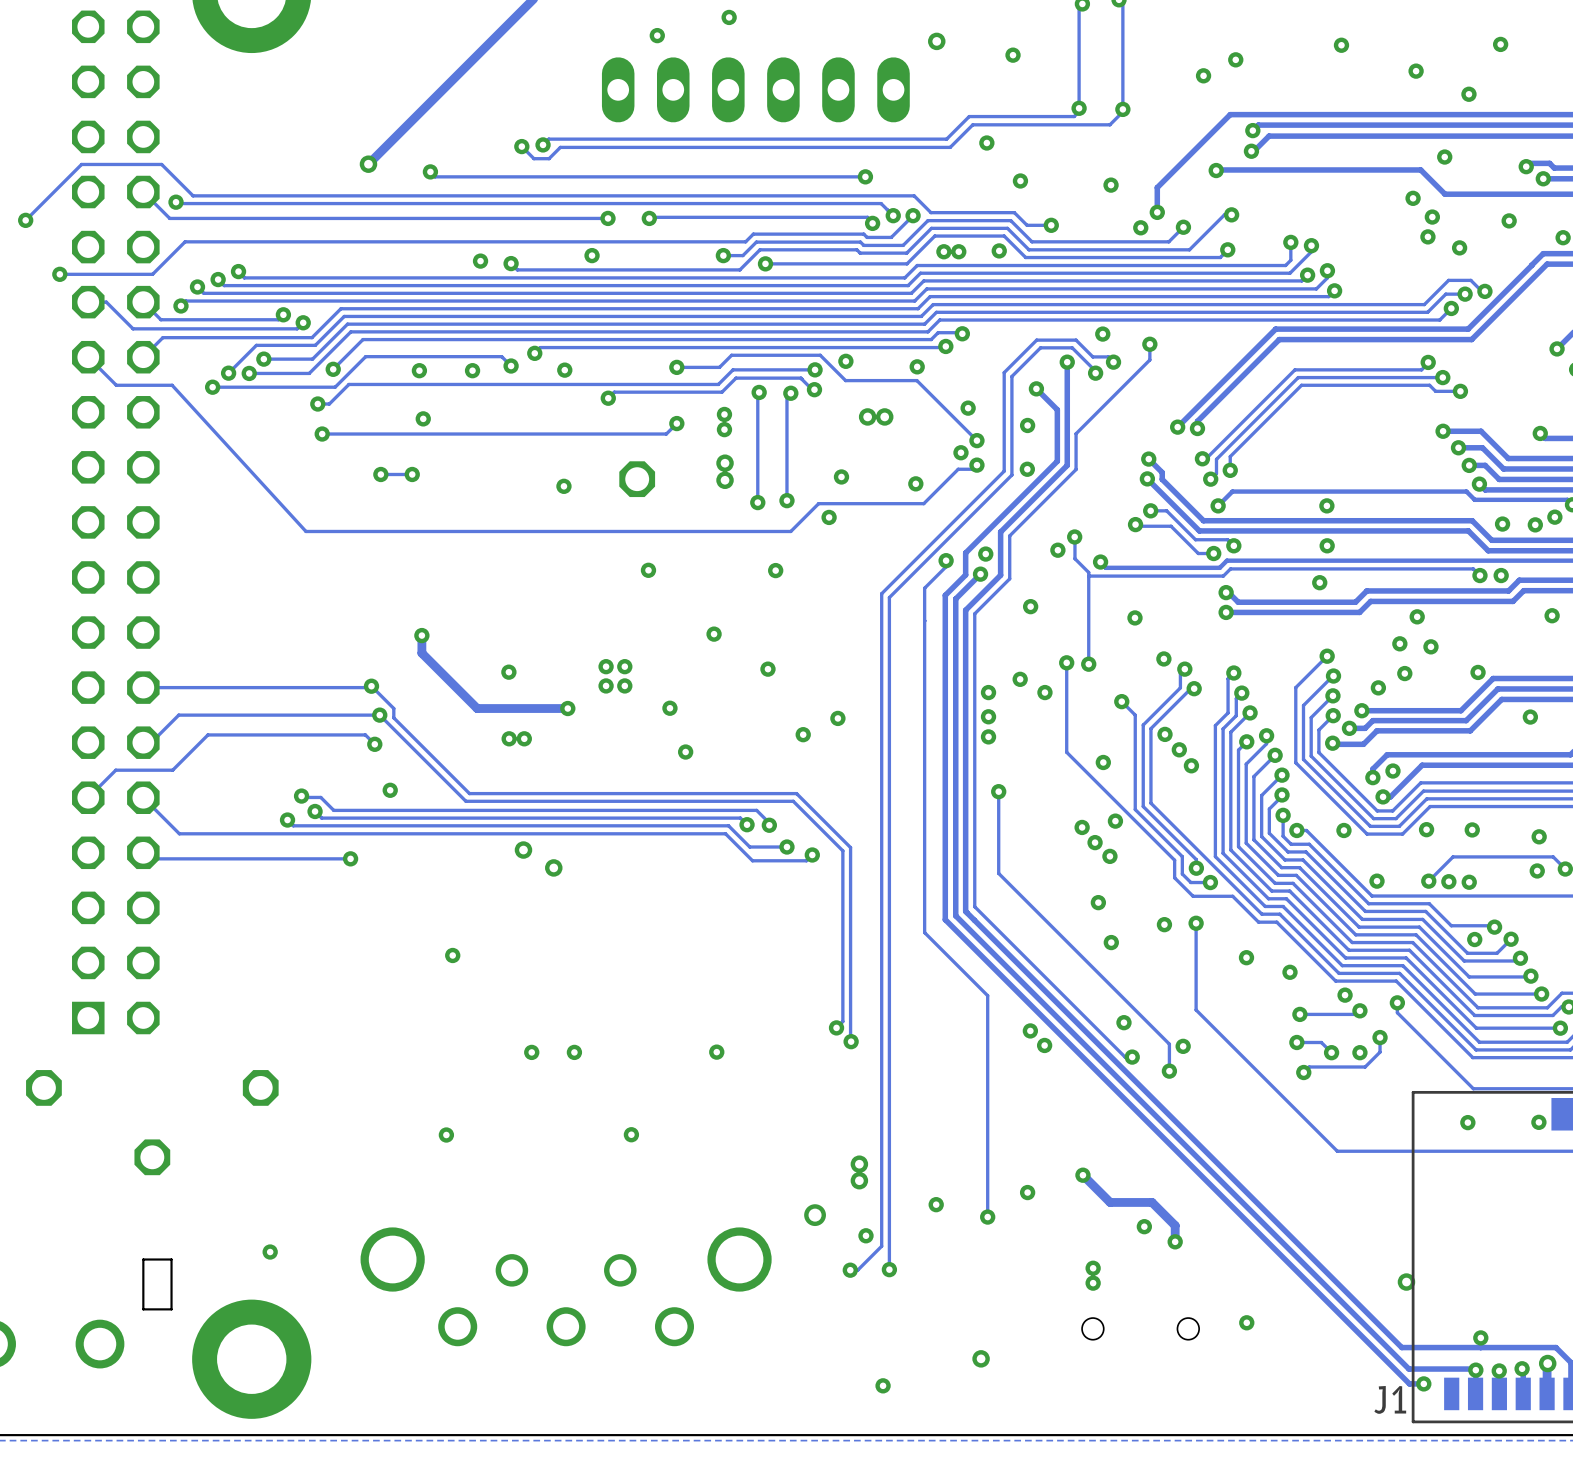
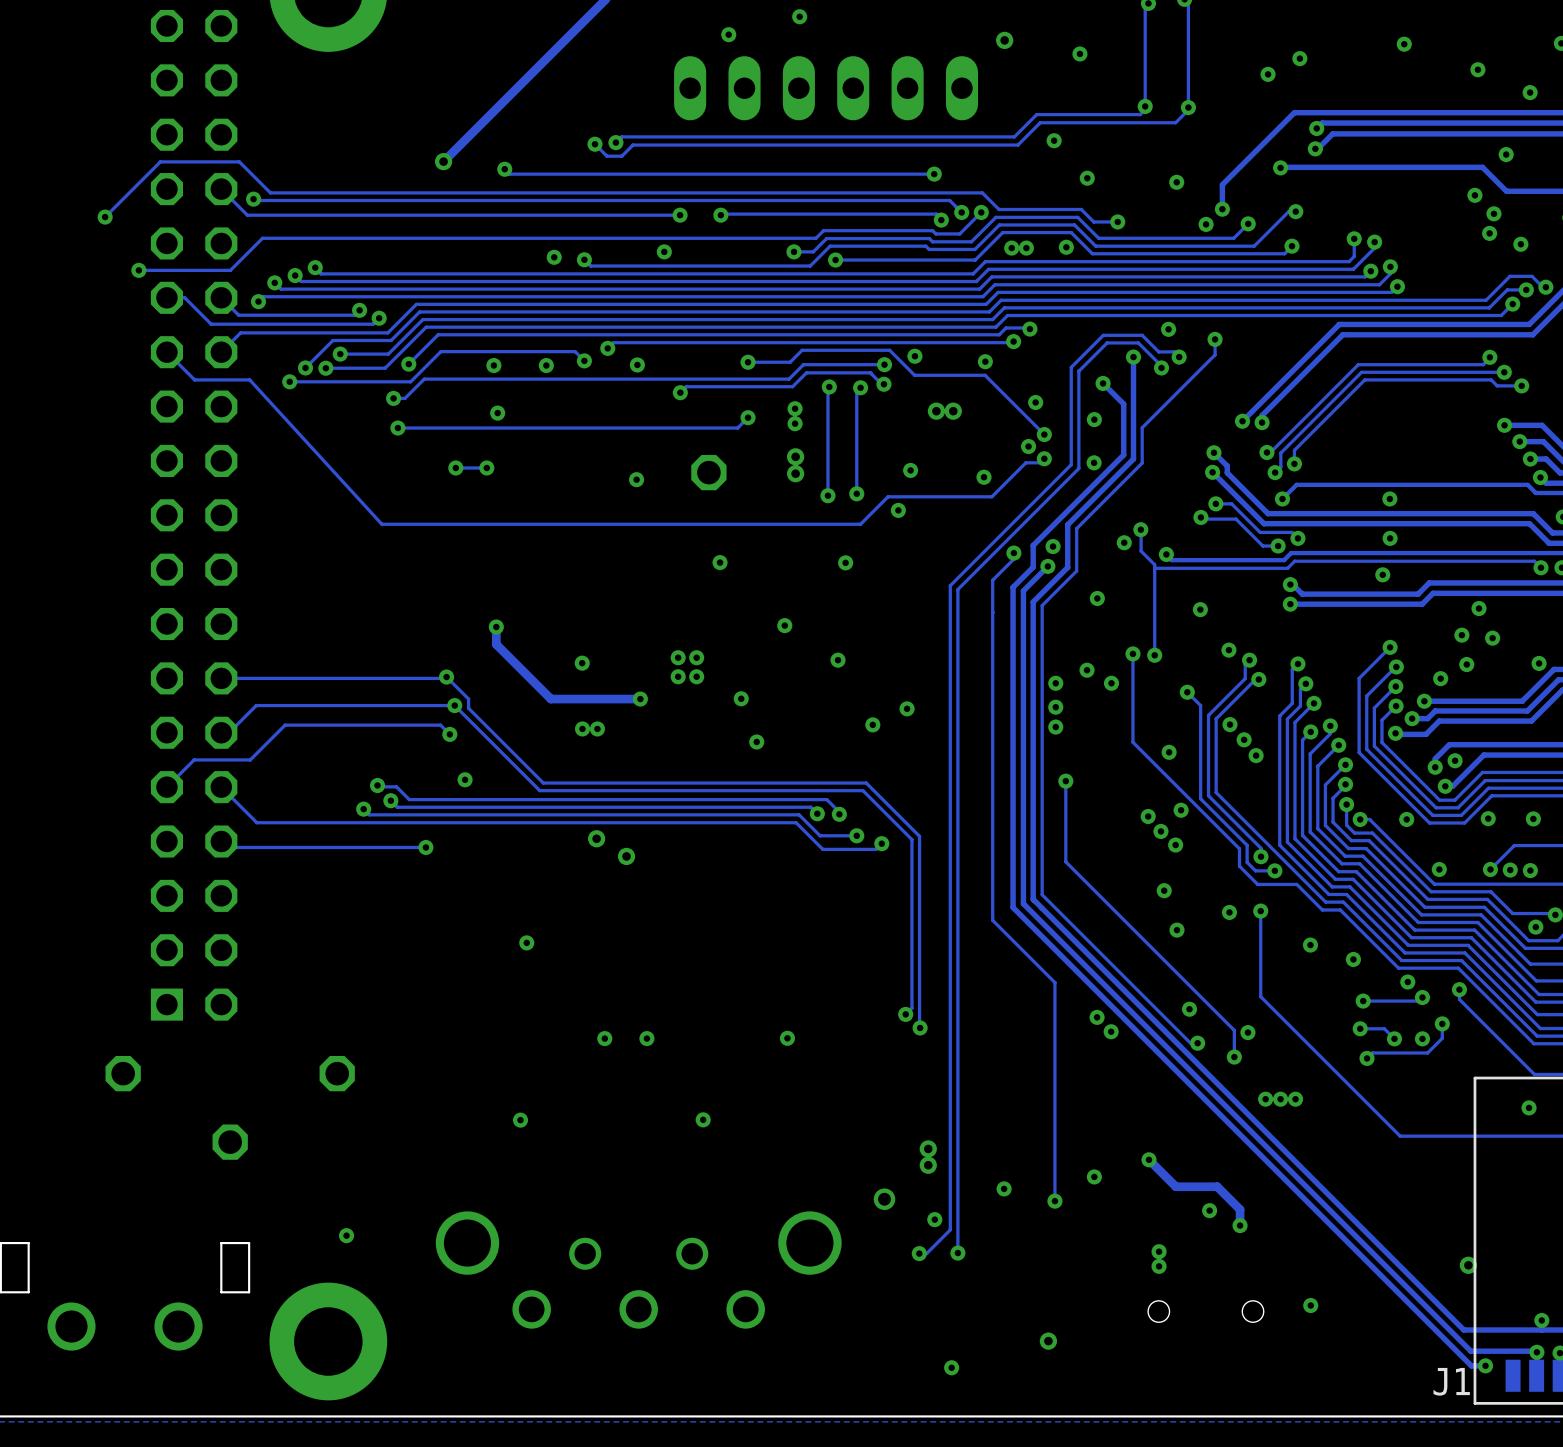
via: none -> (1265, 1099)
via: none -> (1280, 1099)
via: none -> (1295, 1099)

